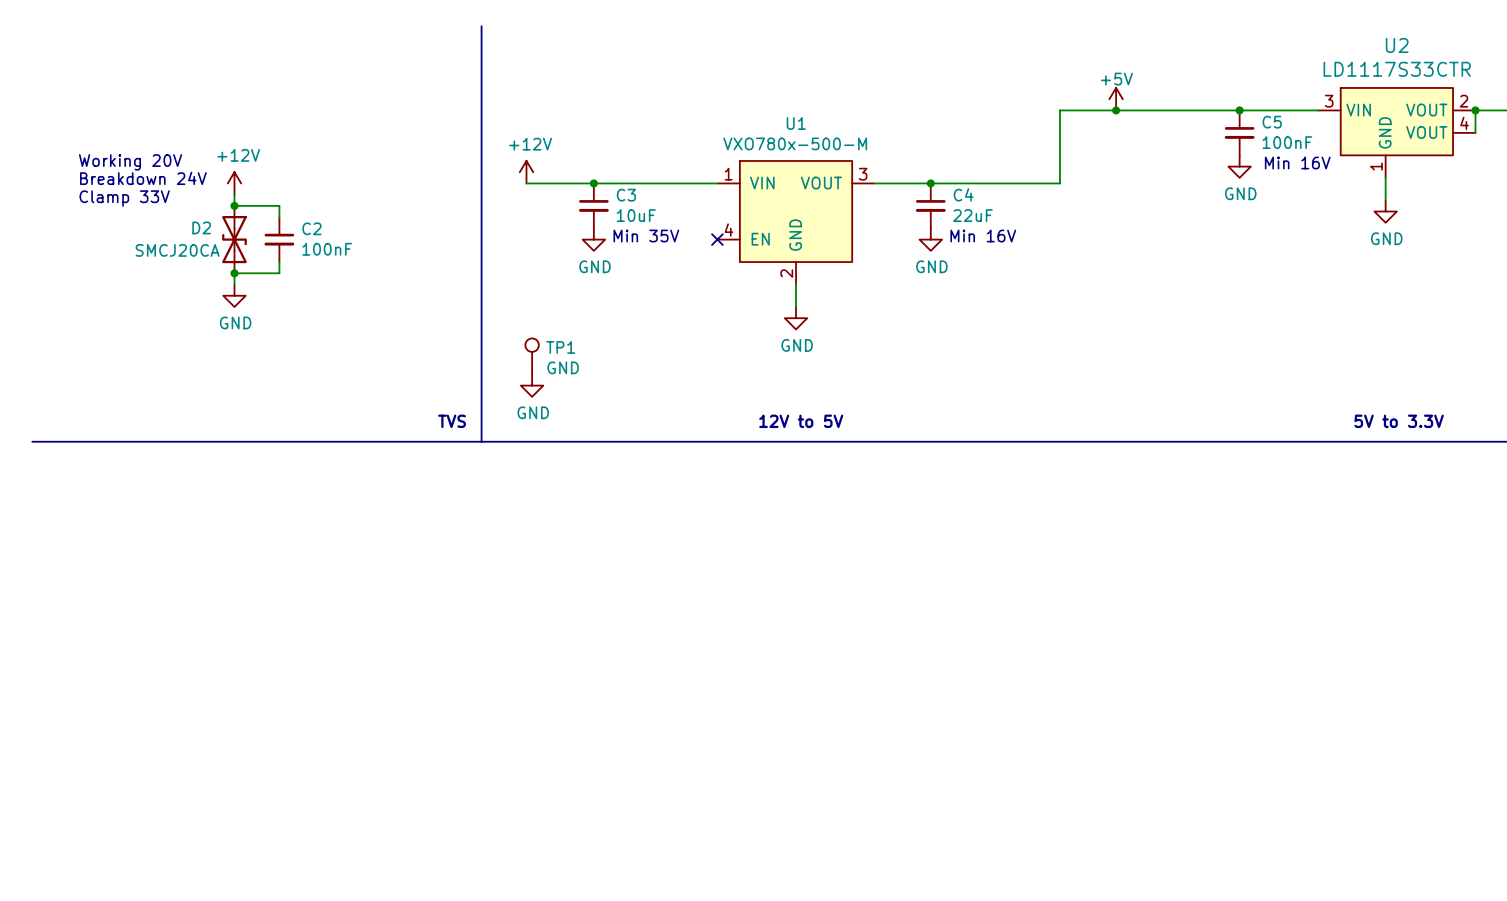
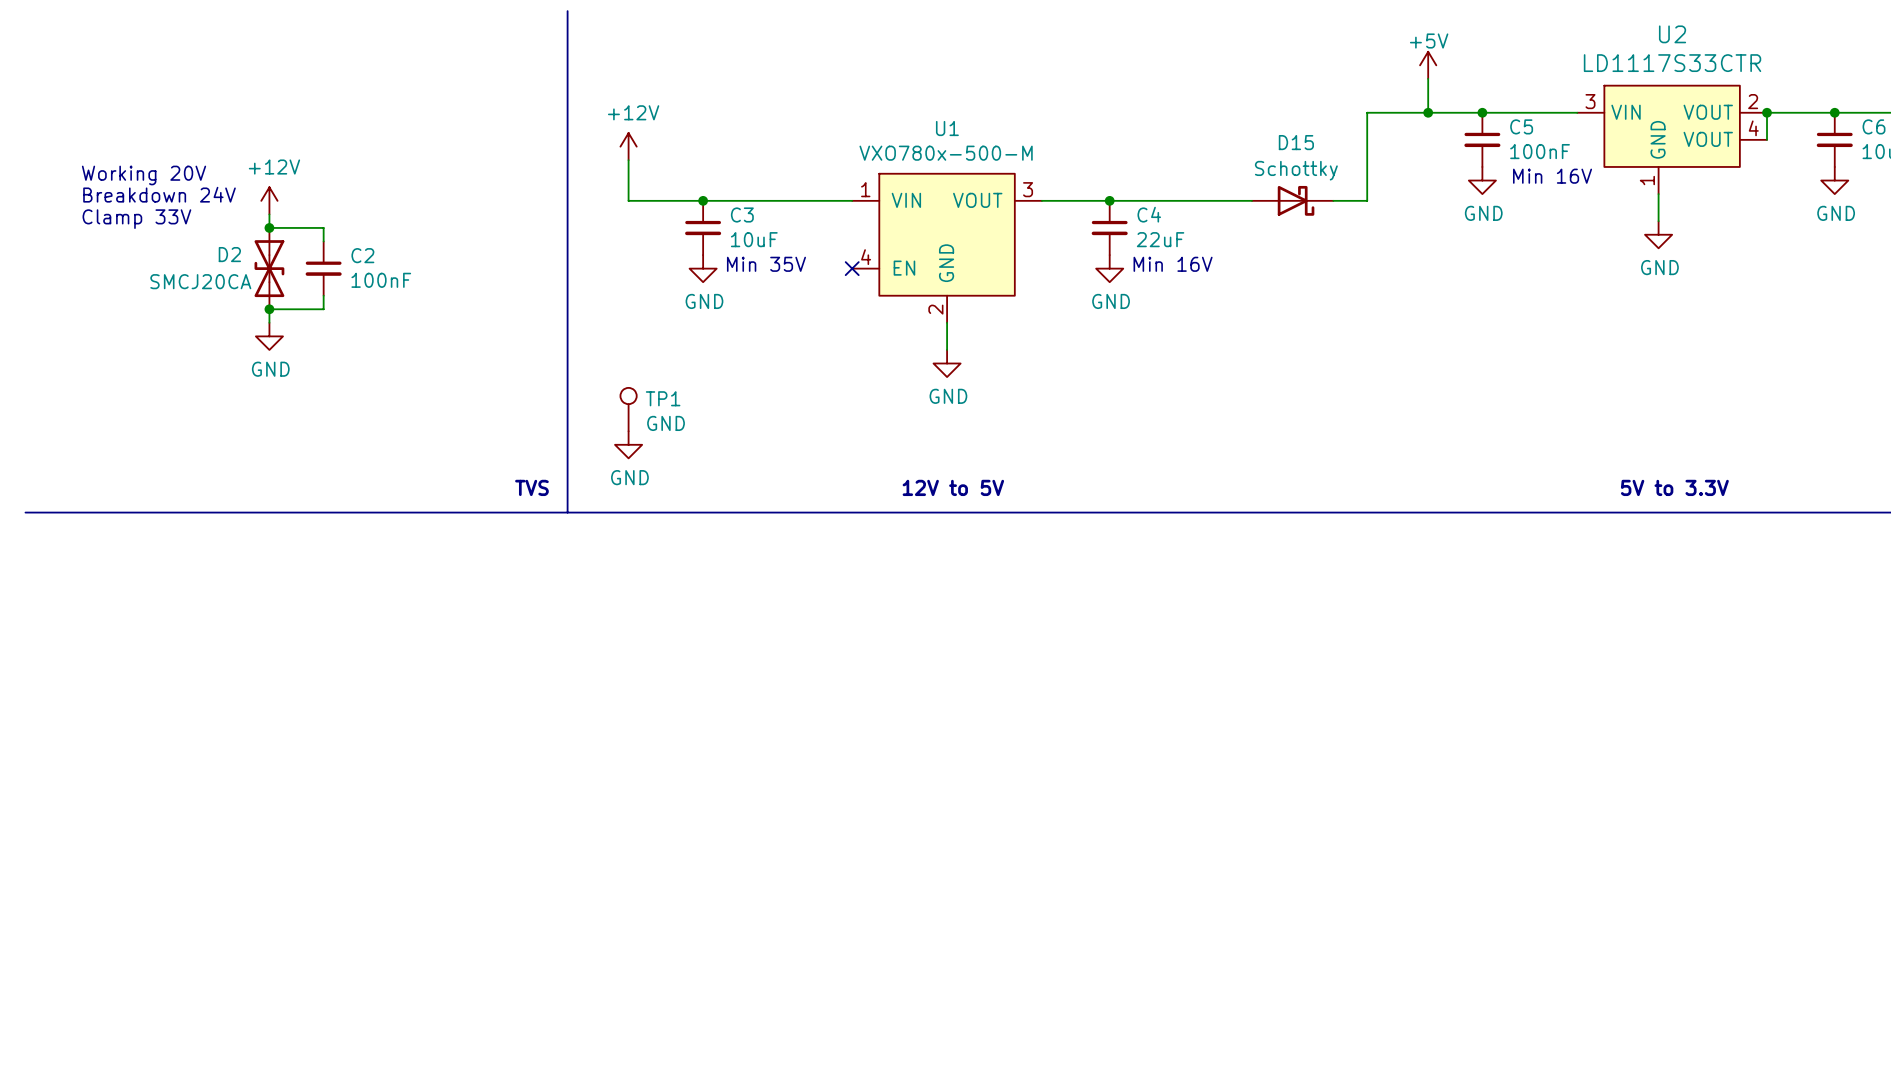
wire: none -> (1428, 78) (1428, 112)
power symbol position: +5V (1116, 99) -> +5V (1428, 65)
junction: (1116, 110) -> none
wire: (1144, 110) (1059, 110) (1059, 183) (1048, 183) -> (1367, 112) (1367, 200) (1333, 200)
junction: none -> (1428, 112)
power symbol position: +12V (526, 172) -> +12V (628, 146)
wire: (526, 183) (532, 183) -> (628, 160) (628, 200)
D15: none -> Schottky (1292, 200)

